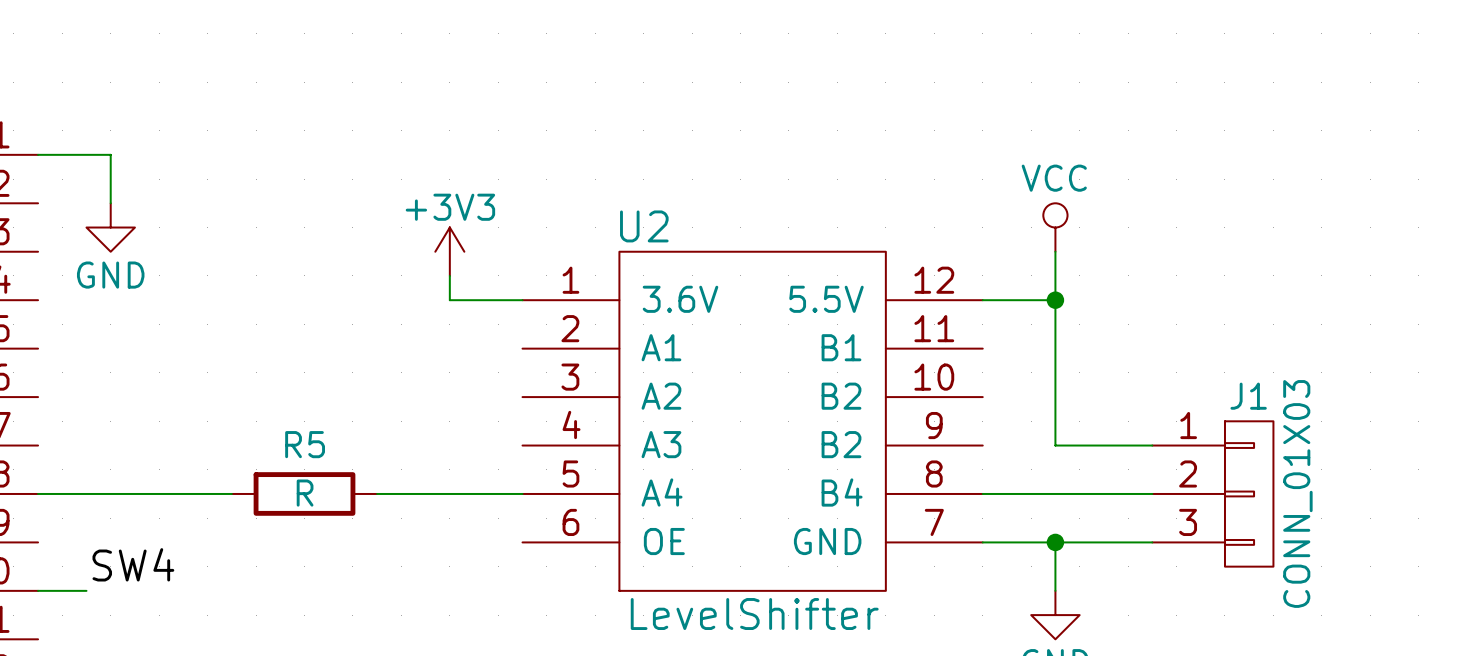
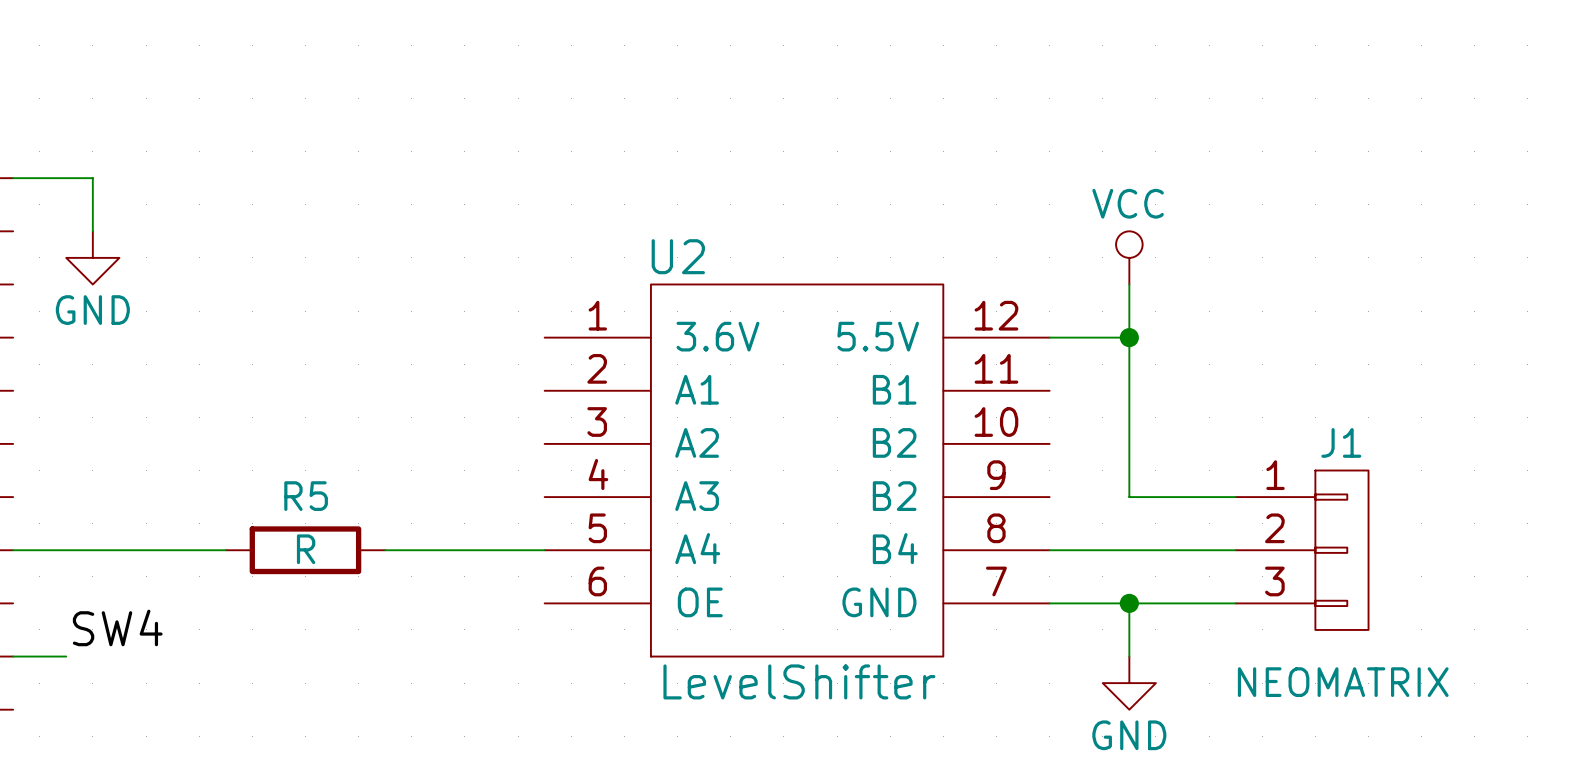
power symbol: +3V3 (449, 251) -> none
wire: (449, 275) (449, 300) (522, 300) -> none
J1 value: CONN_01X03 (1297, 493) -> NEOMATRIX (1343, 682)

